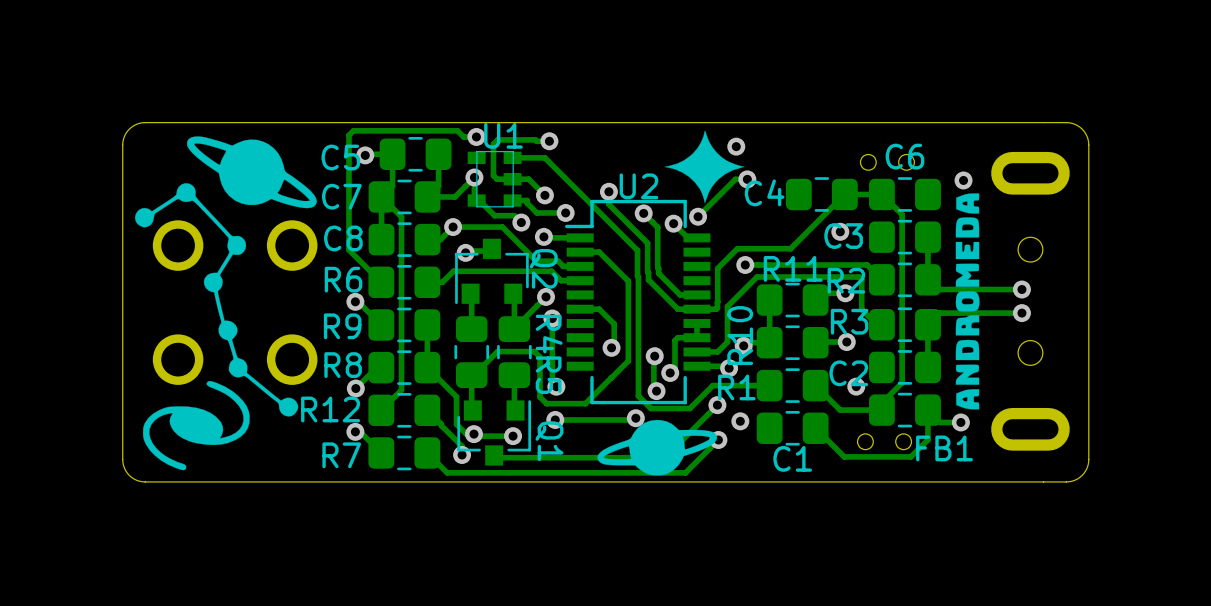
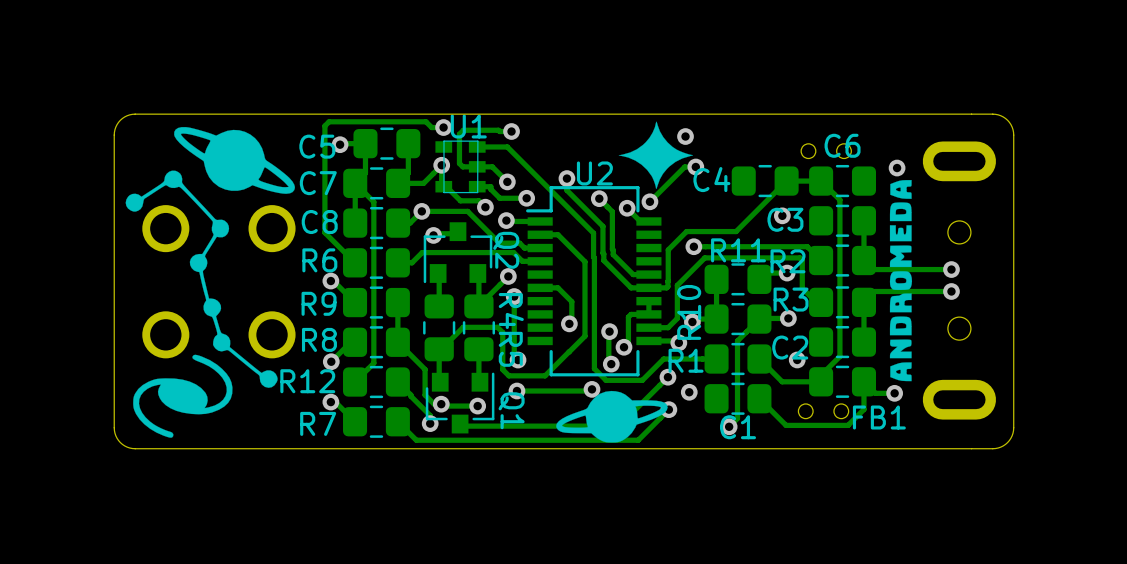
track: none -> (759, 319) (737, 340) (737, 418) (729, 426)
via: none -> (729, 426)

